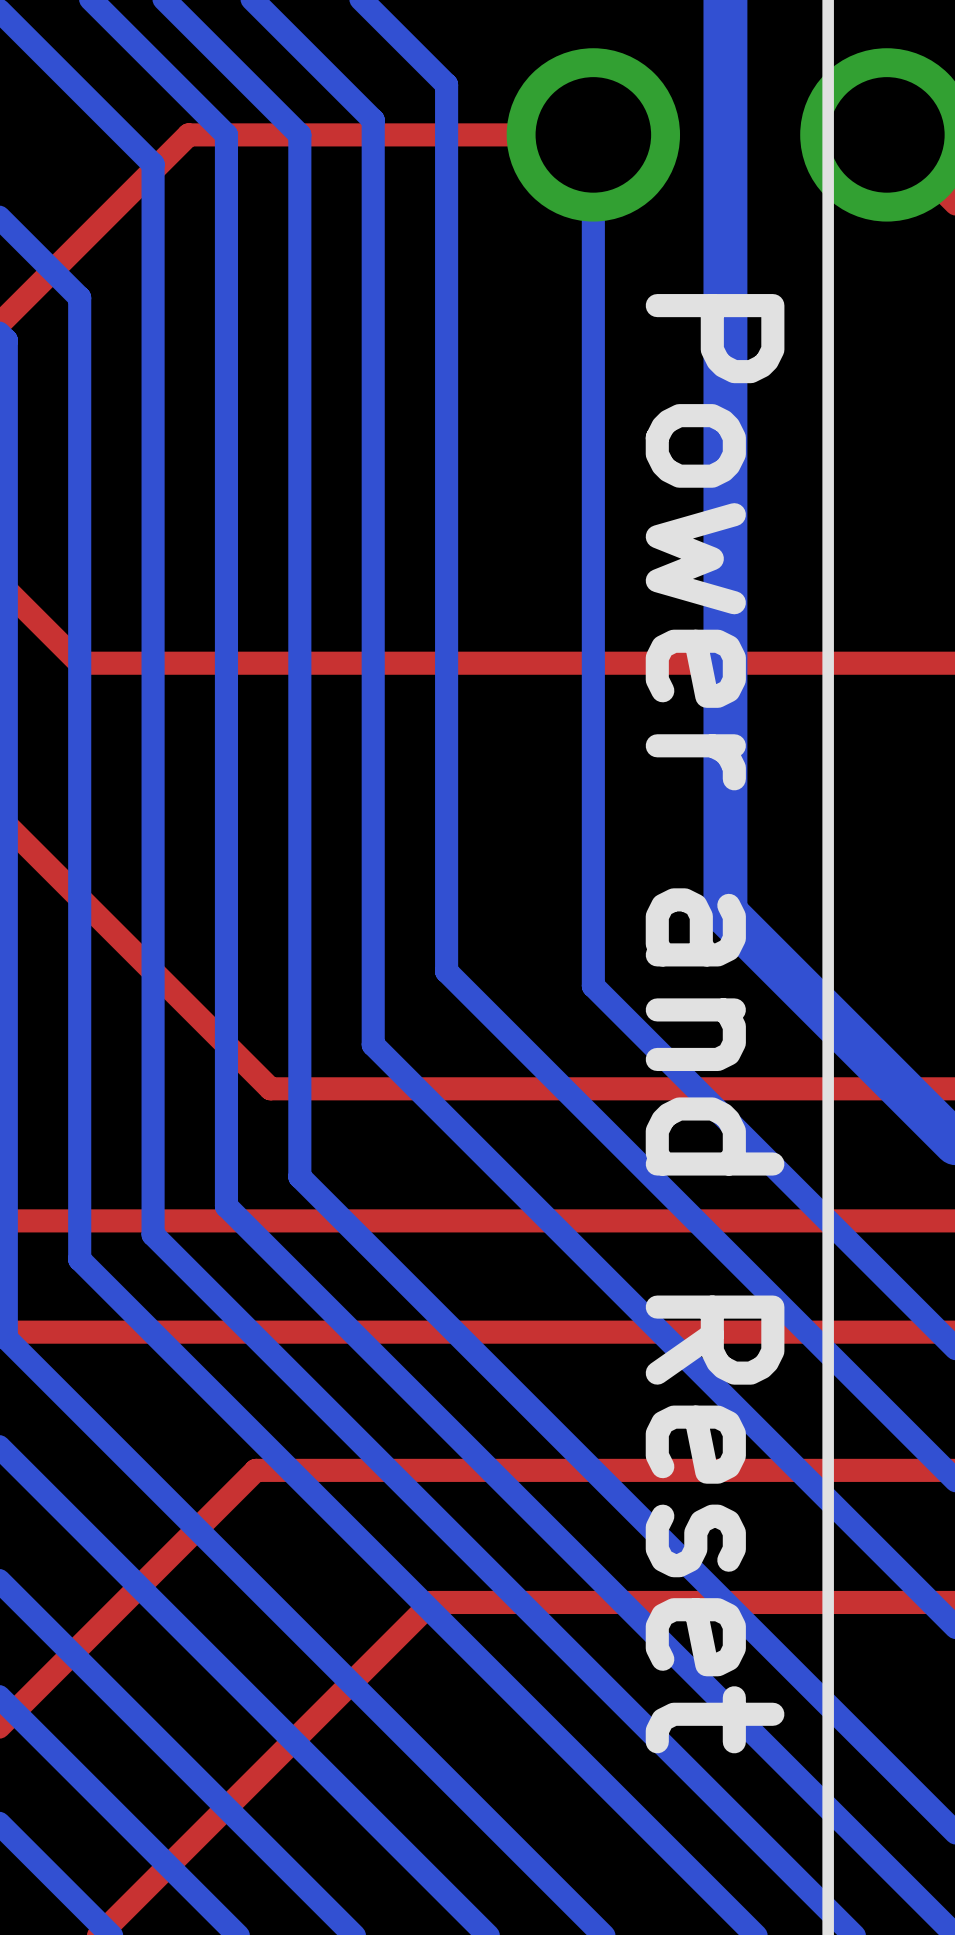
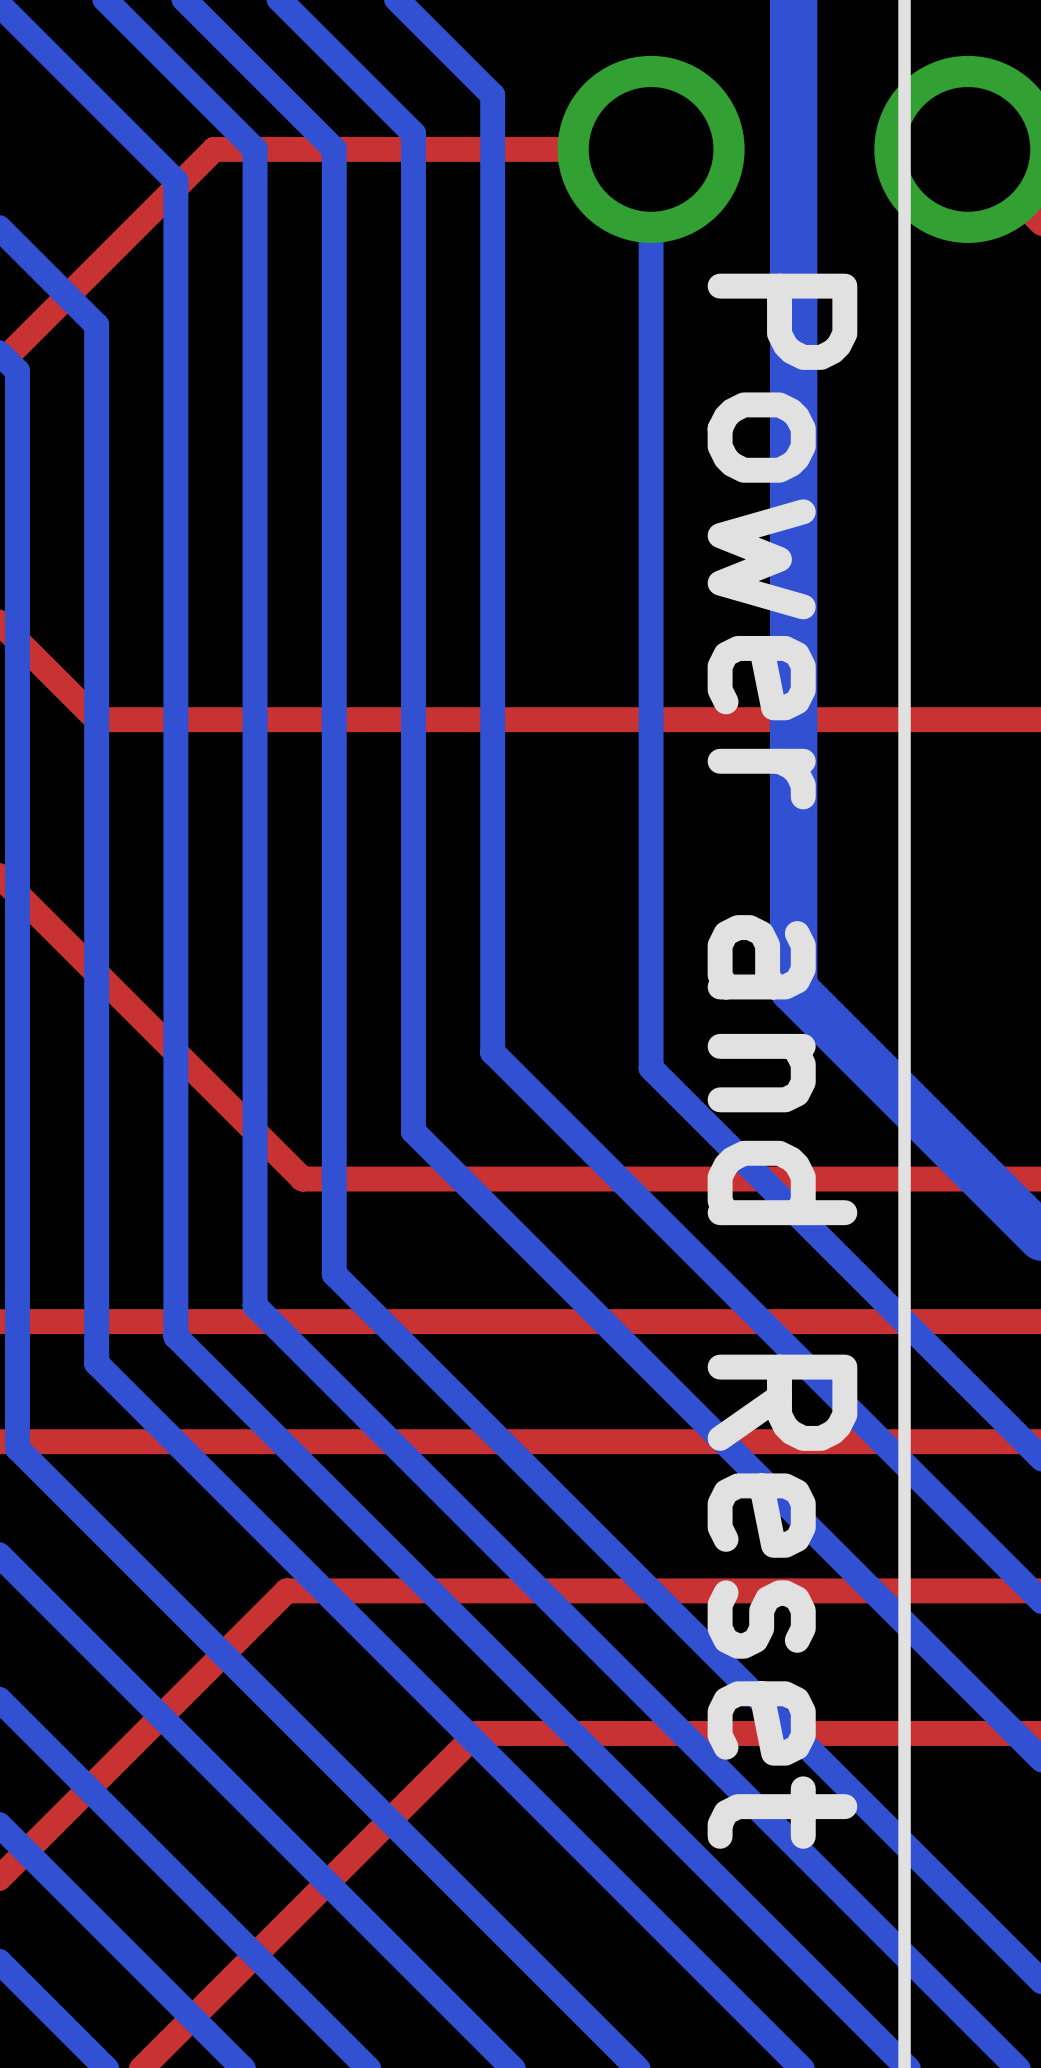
part text position: Power and Reset (715, 1023) -> Power and Reset (782, 1061)

